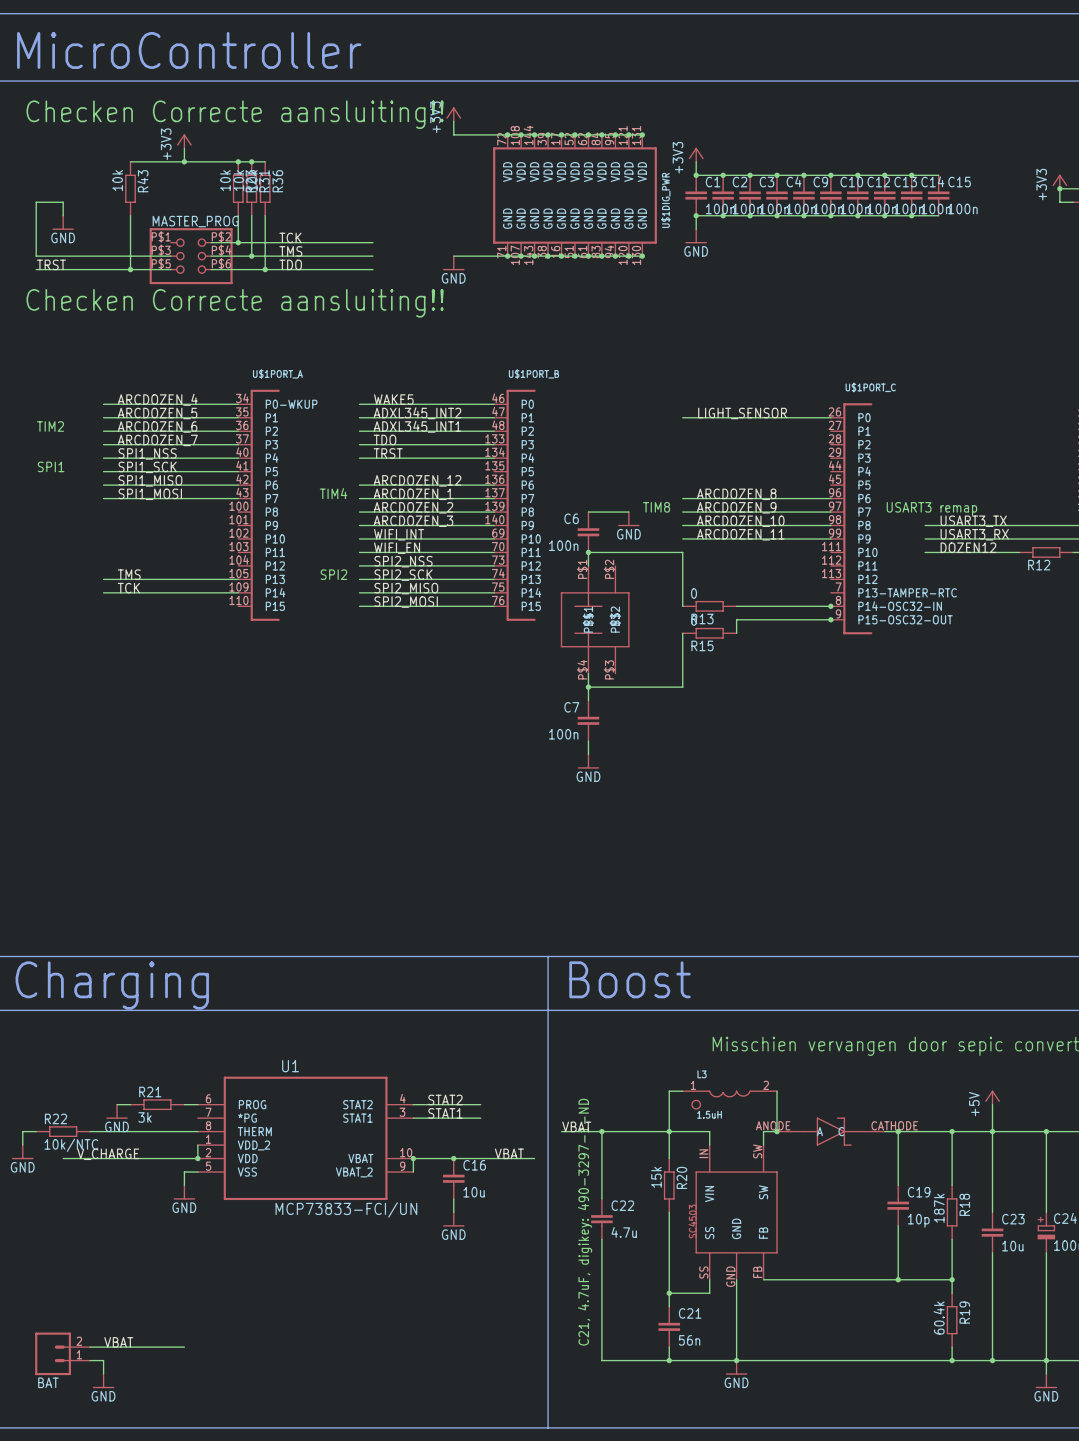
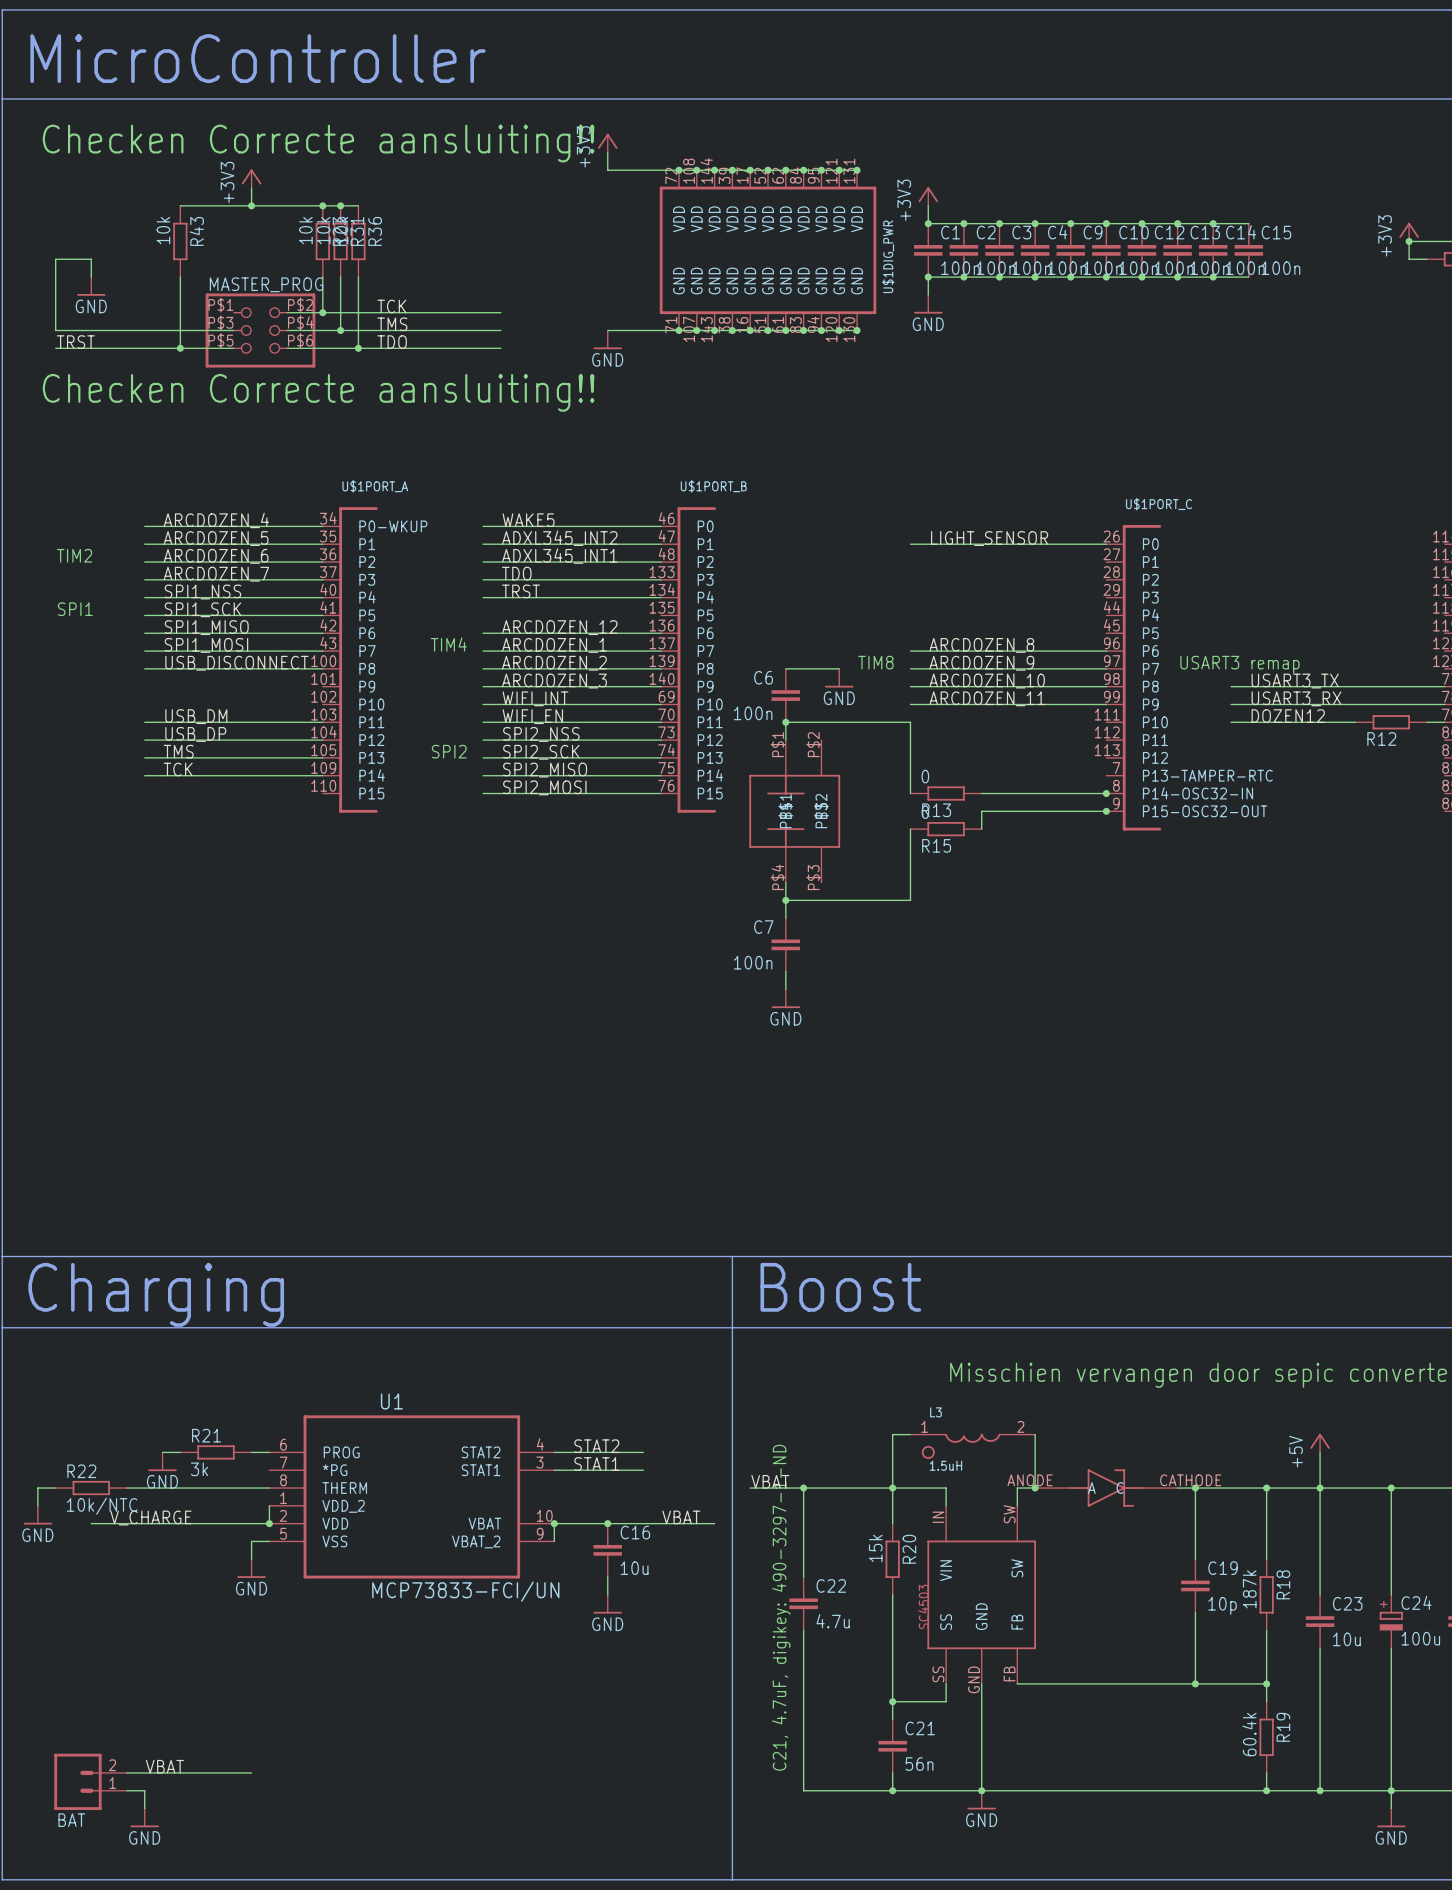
label: none -> USB_DISCONNECT (236, 663)
wire: none -> (144, 668) (322, 668)
label: none -> USB_DM (196, 716)
wire: none -> (144, 722) (322, 722)
label: none -> USB_DP (195, 734)
wire: none -> (144, 740) (322, 740)

